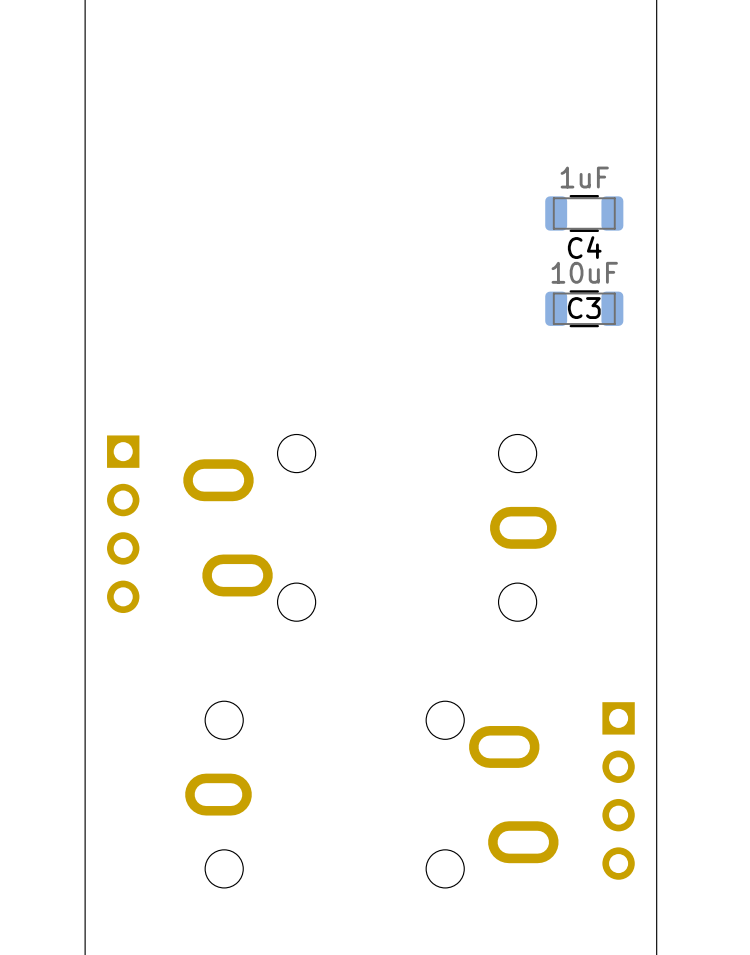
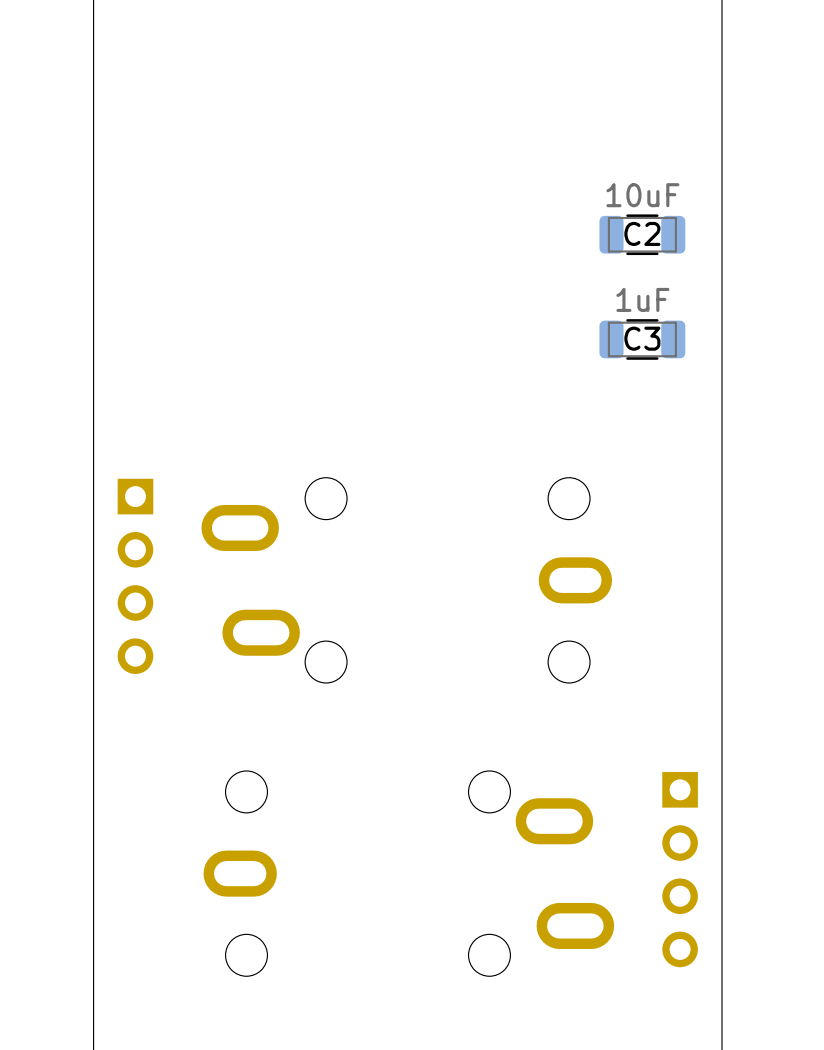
C4 value: 1uF (584, 177) -> 10uF (642, 195)
C4 name: C4 (584, 247) -> C2 (642, 233)
C3 value: 10uF (584, 272) -> 1uF (642, 299)

